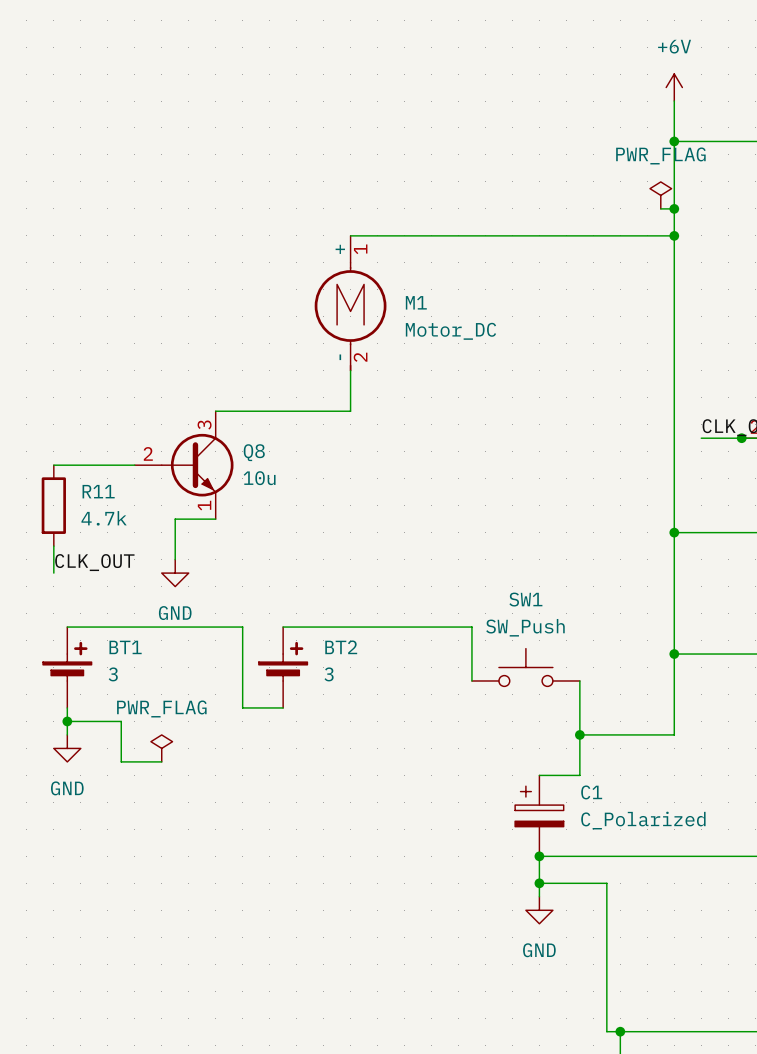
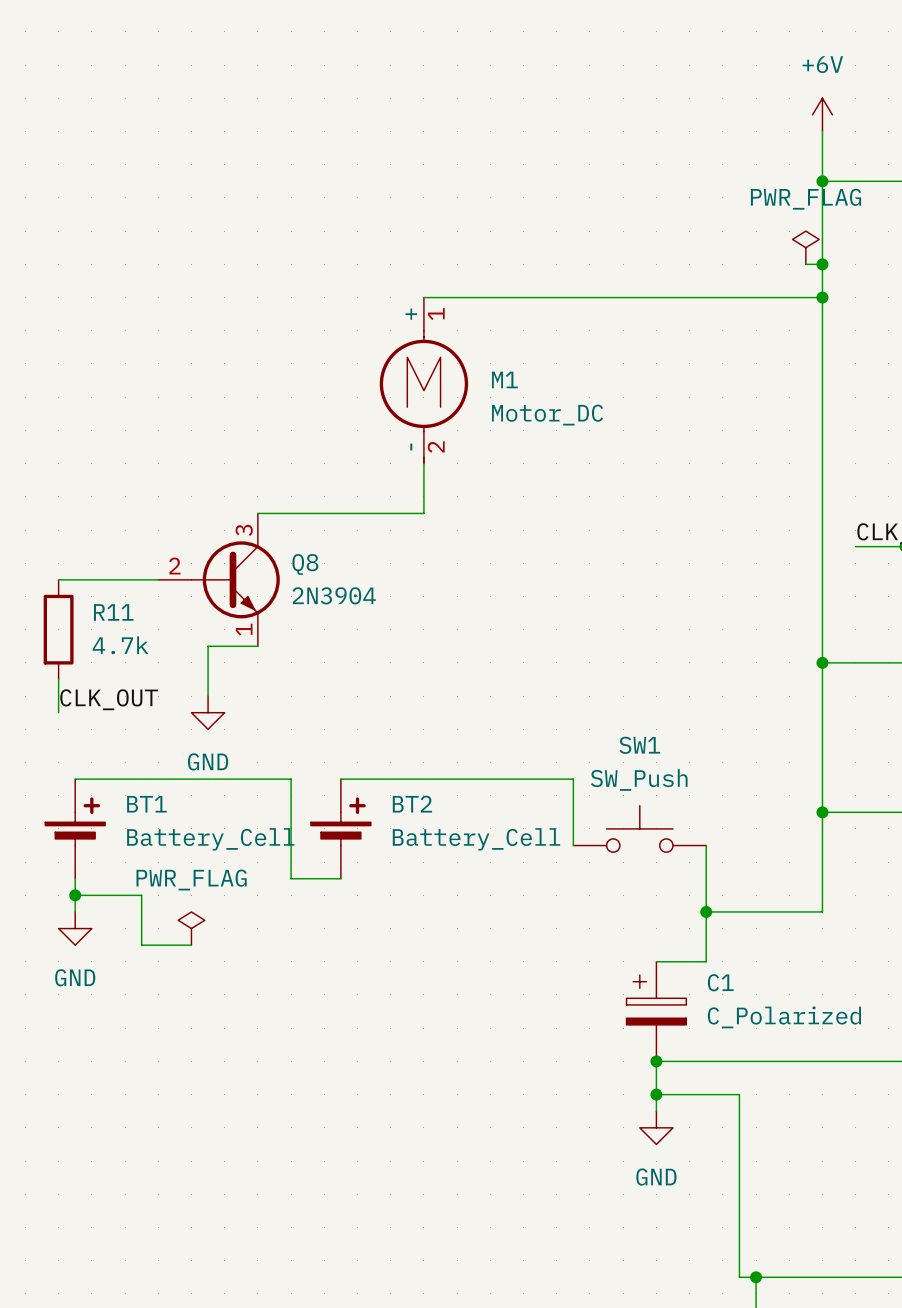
Q8 value: 10u (259, 478) -> 2N3904 (334, 595)
BT1 value: 3 (113, 674) -> Battery_Cell (210, 839)
BT2 value: 3 (329, 674) -> Battery_Cell (476, 839)

